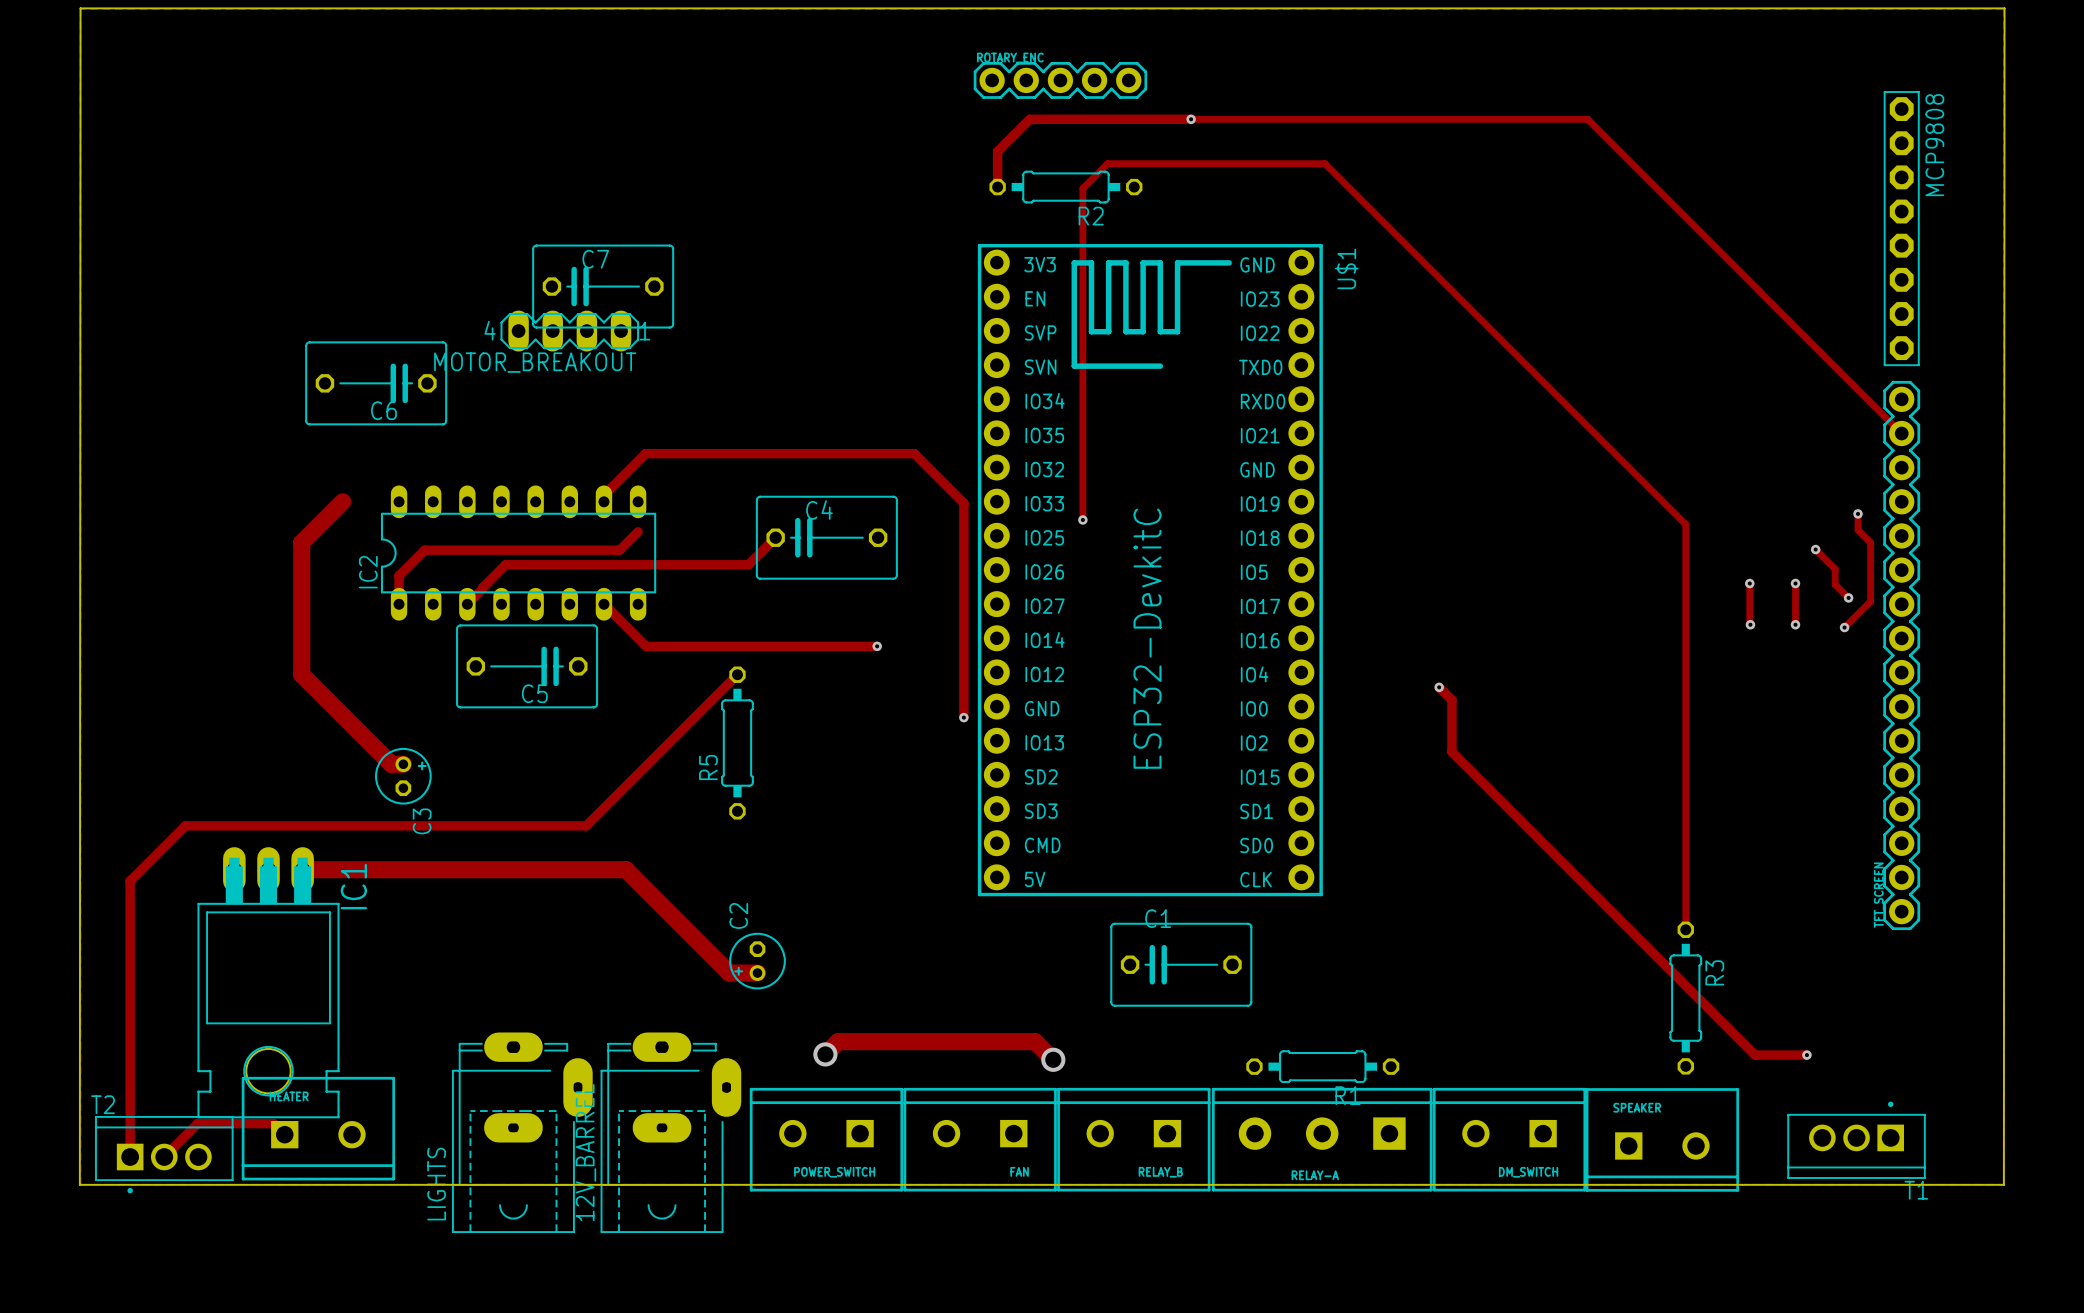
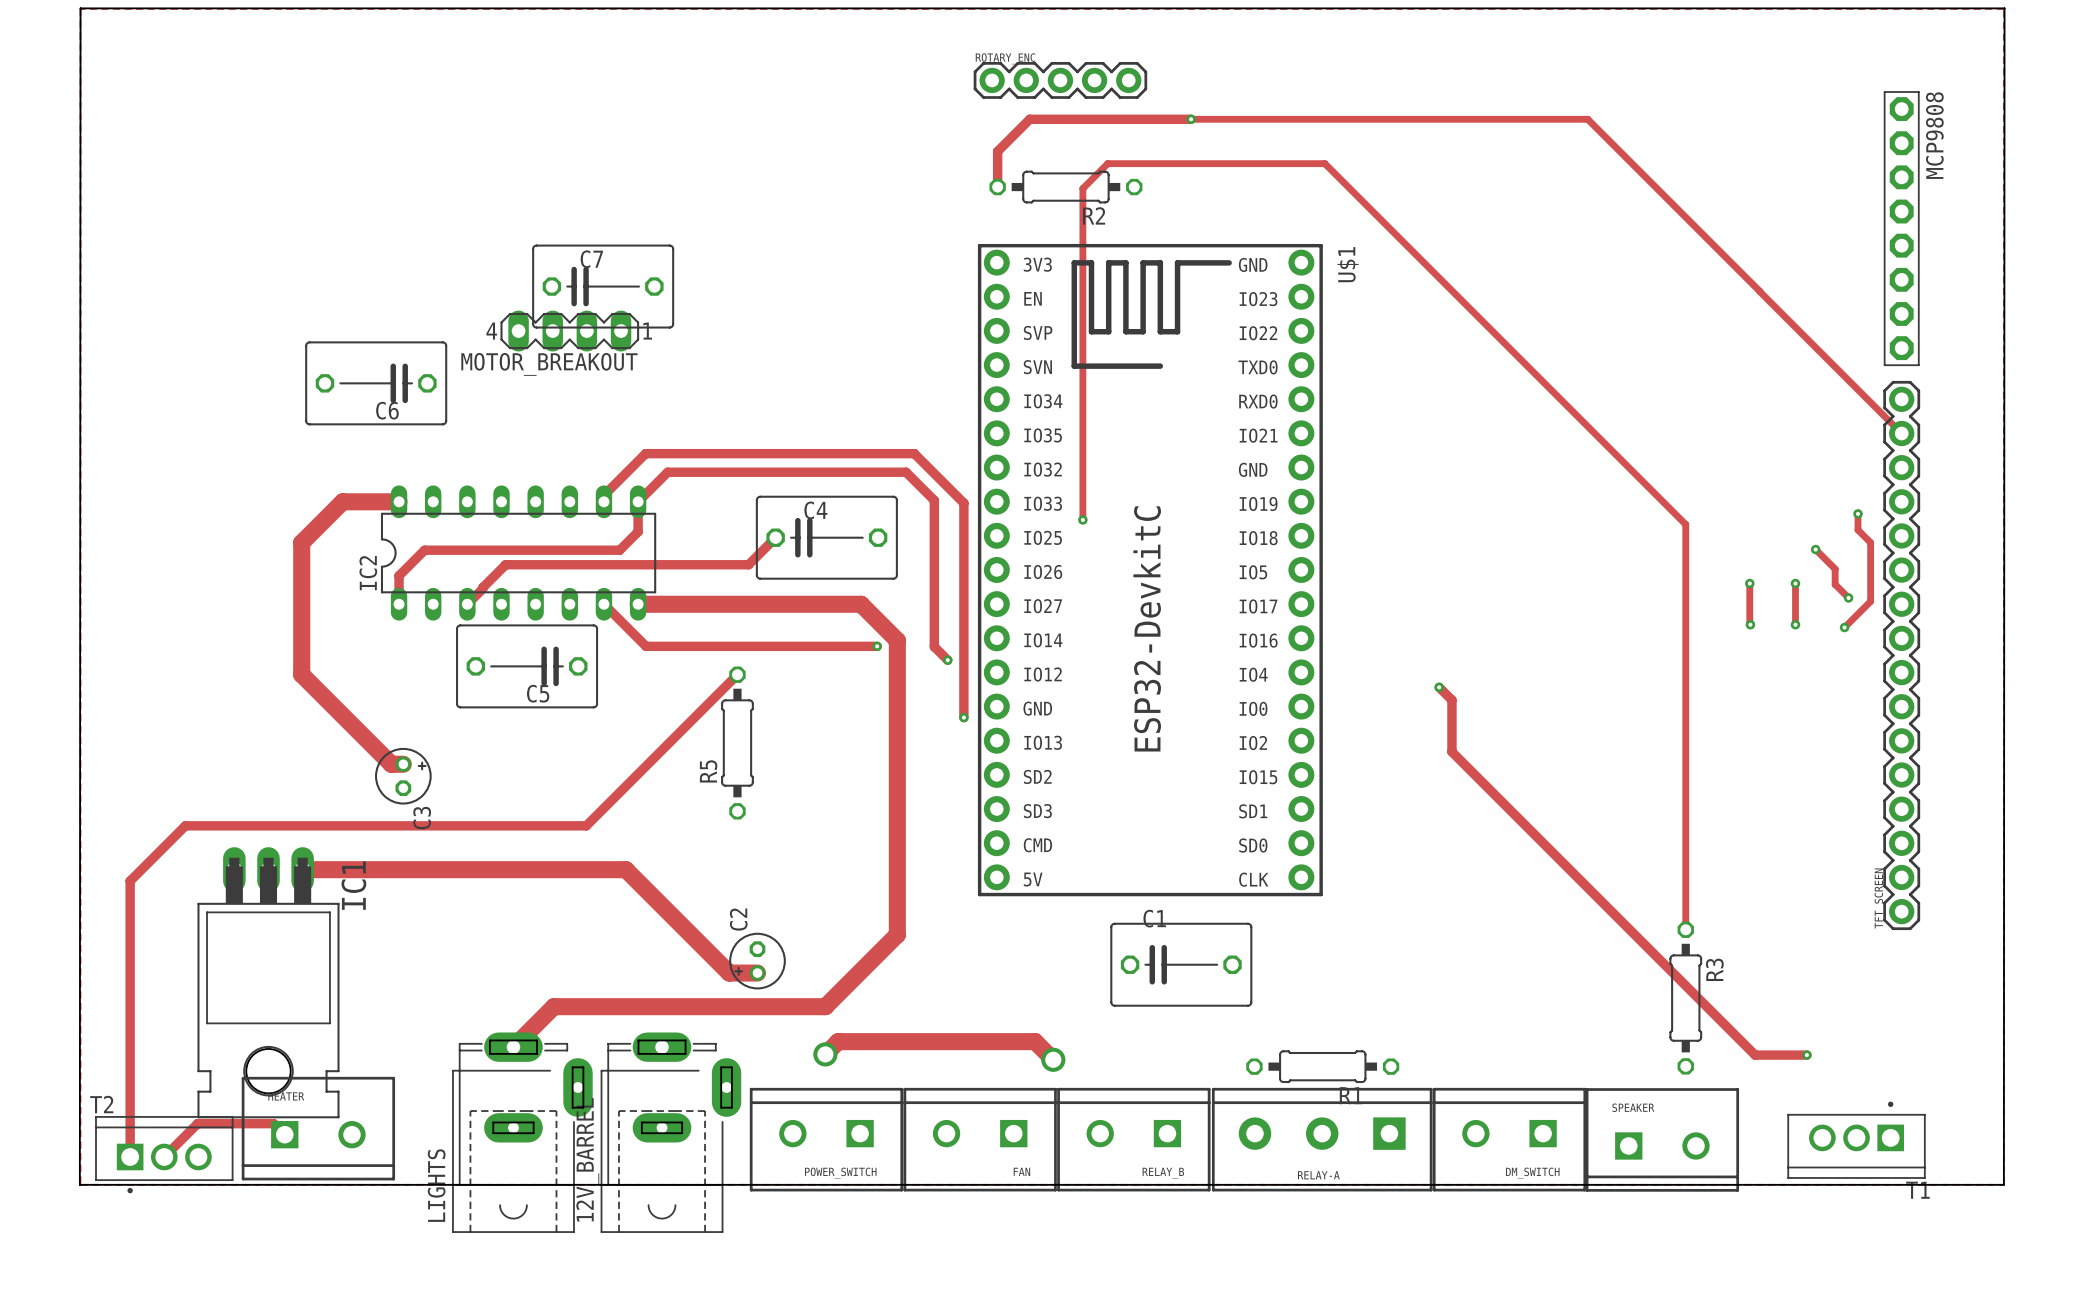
track: none -> (342, 501) (399, 501)
track: none -> (638, 531) (638, 501) (667, 472) (906, 472) (934, 500) (934, 646) (947, 660)
track: none -> (638, 604) (861, 604) (897, 640) (897, 934) (825, 1006) (553, 1006) (513, 1047)
via: none -> (947, 660)

